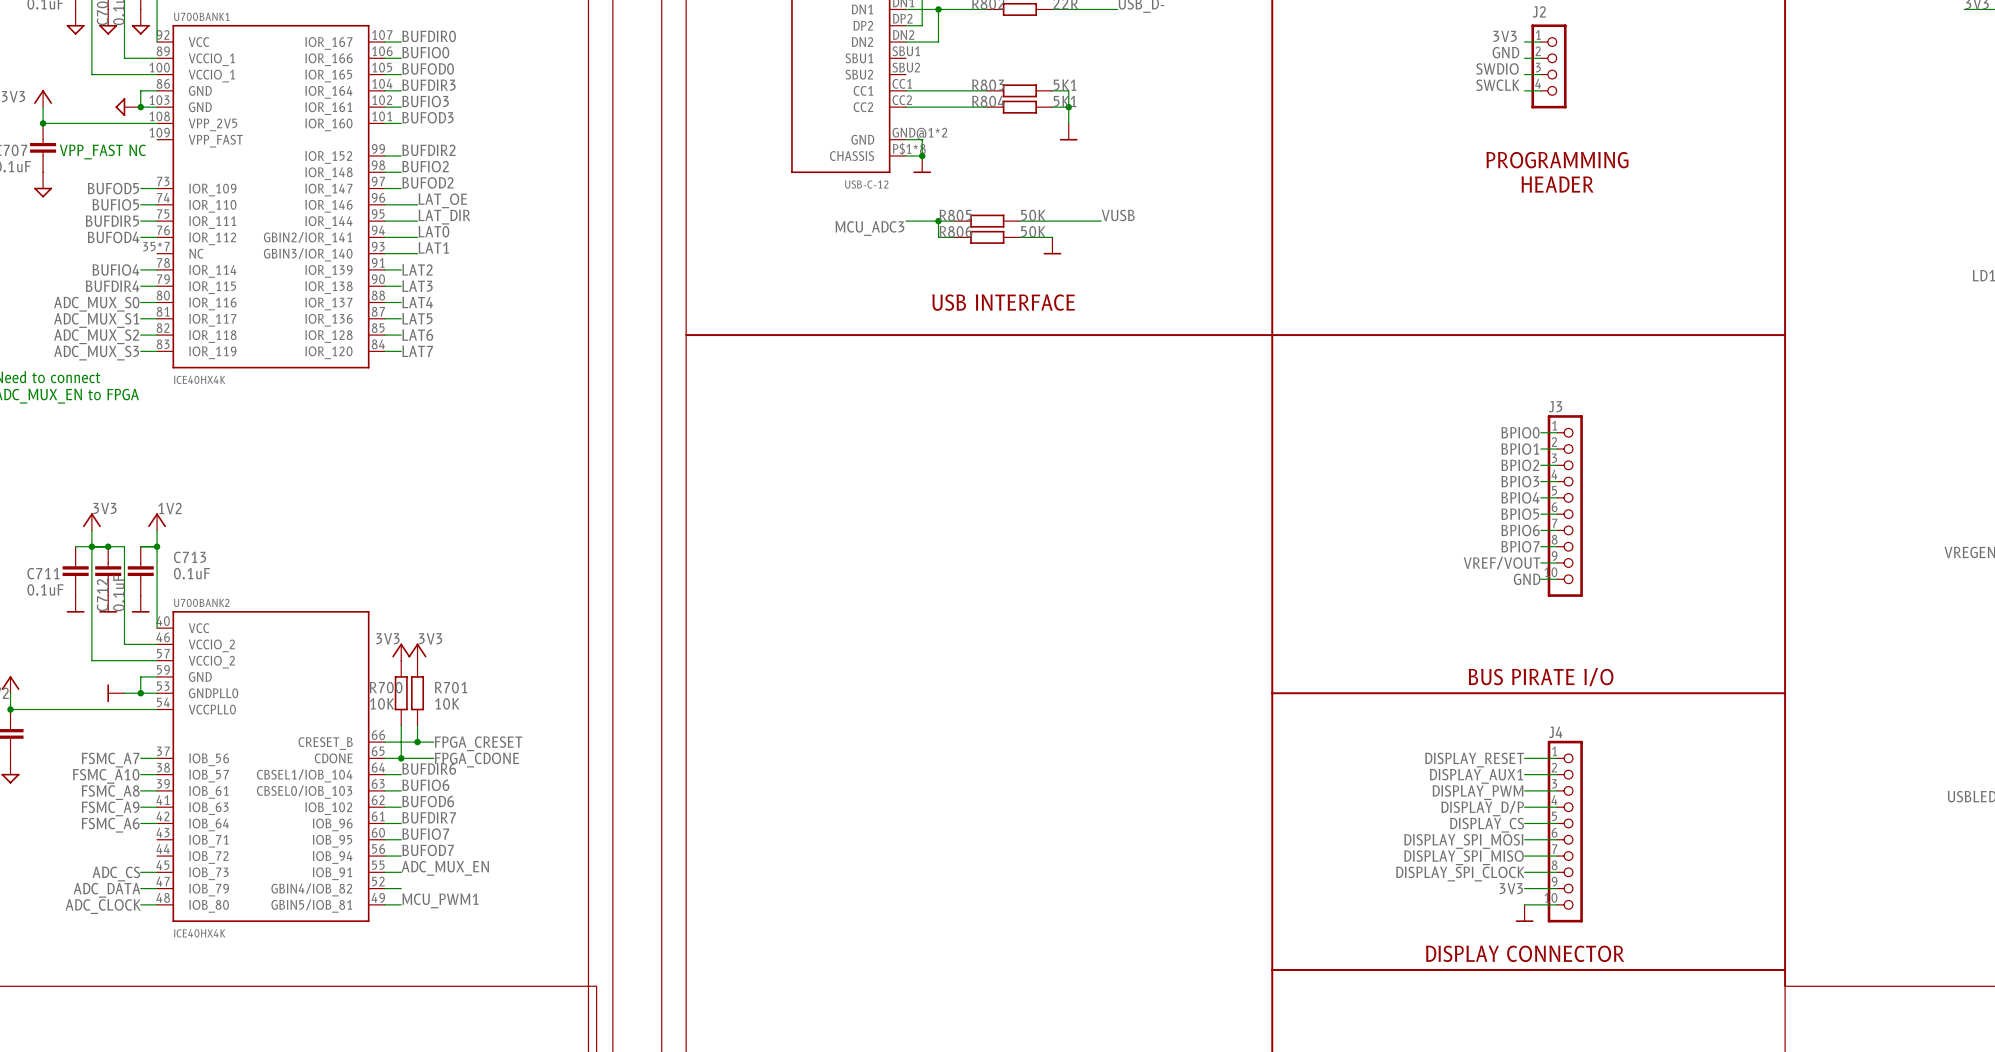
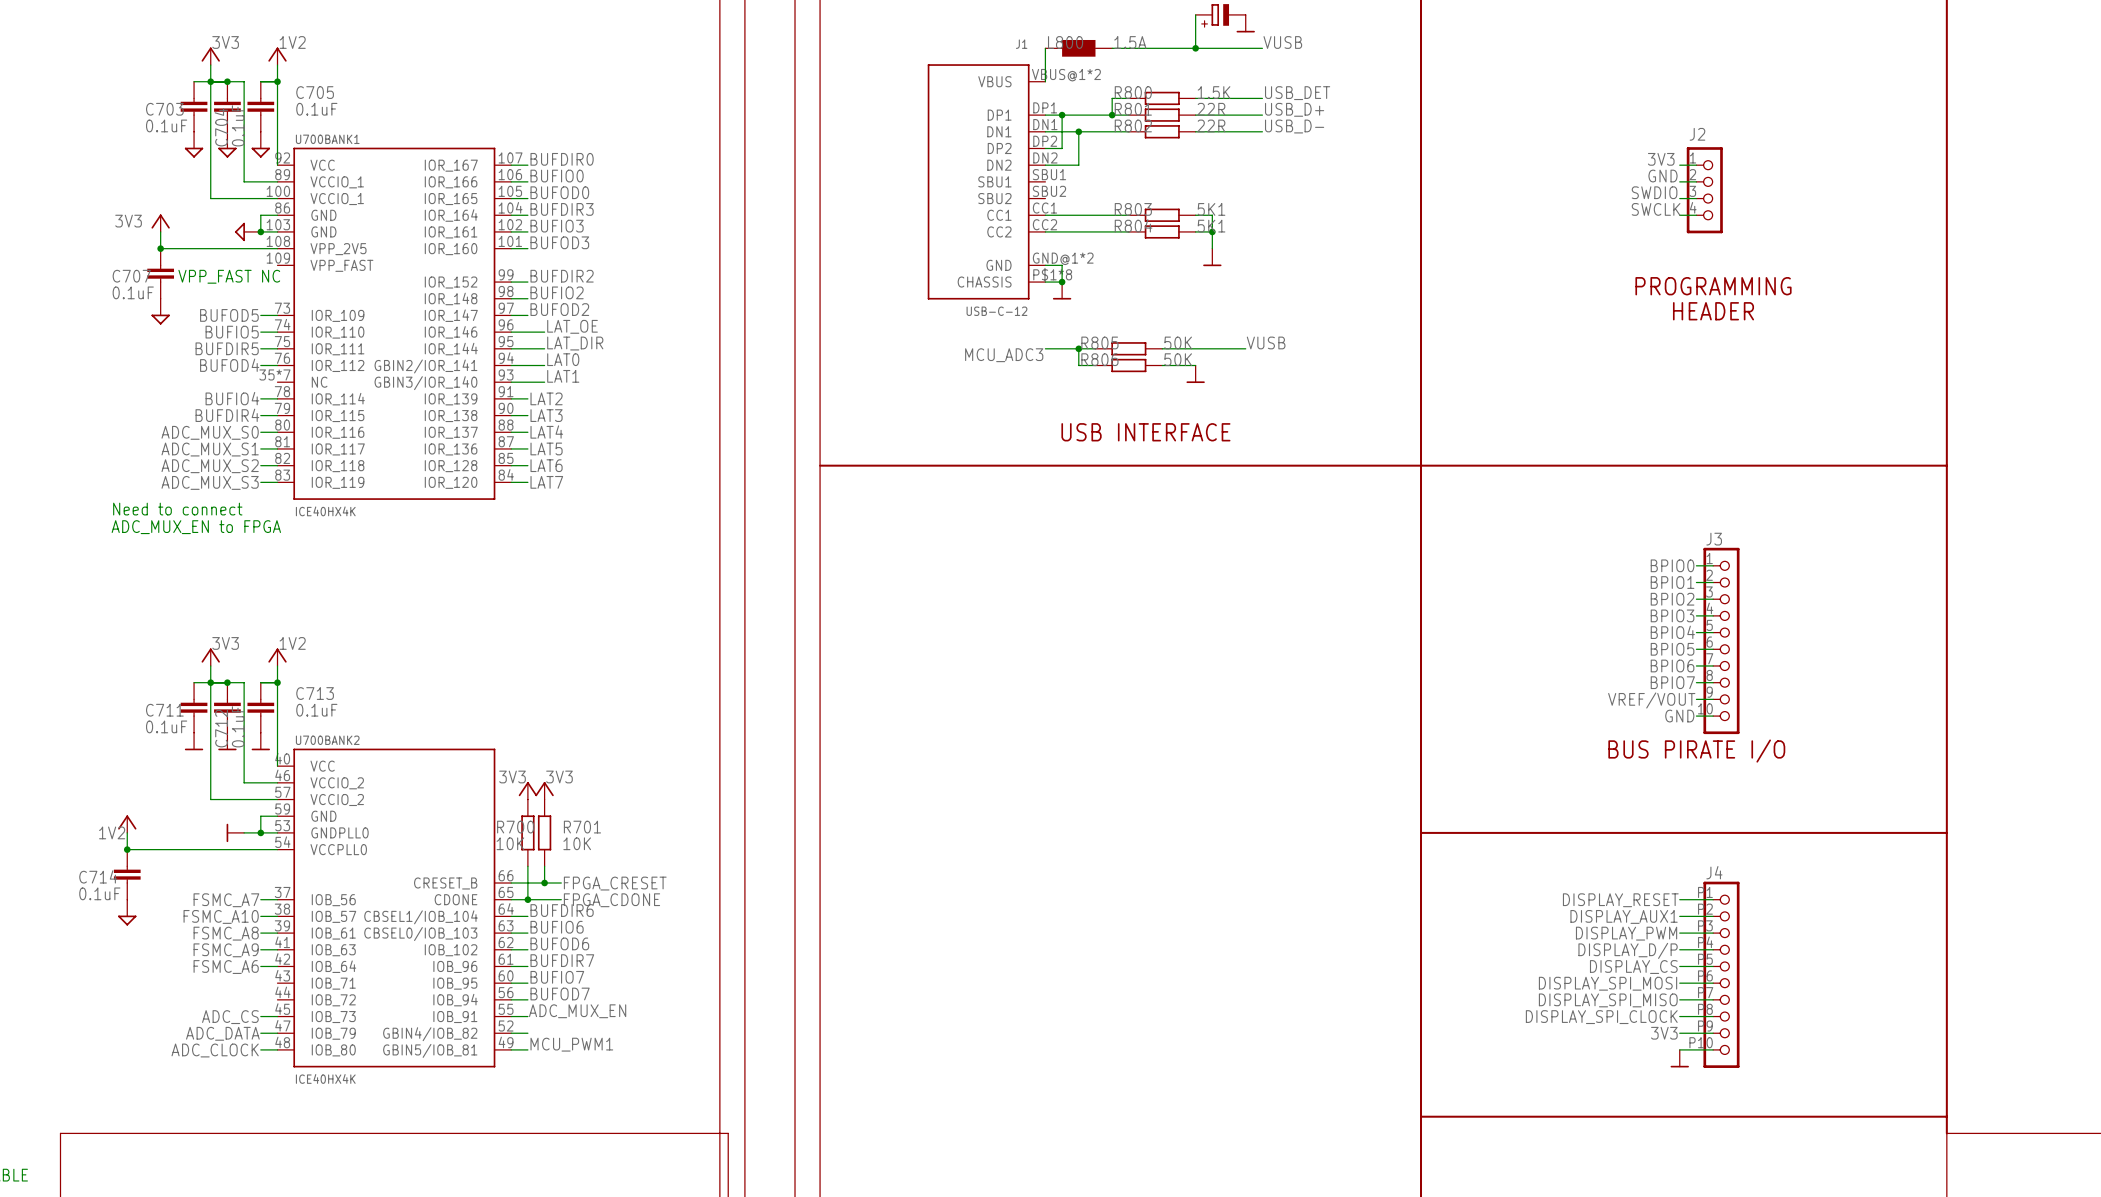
text position: BUS PIRATE I/O (1541, 677) -> BUS PIRATE I/O (1696, 751)
J4 symbol: [1547, 740, 1583, 923] -> [1703, 881, 1740, 1068]
text: DISPLAY CONNECTOR (1525, 953) -> none

